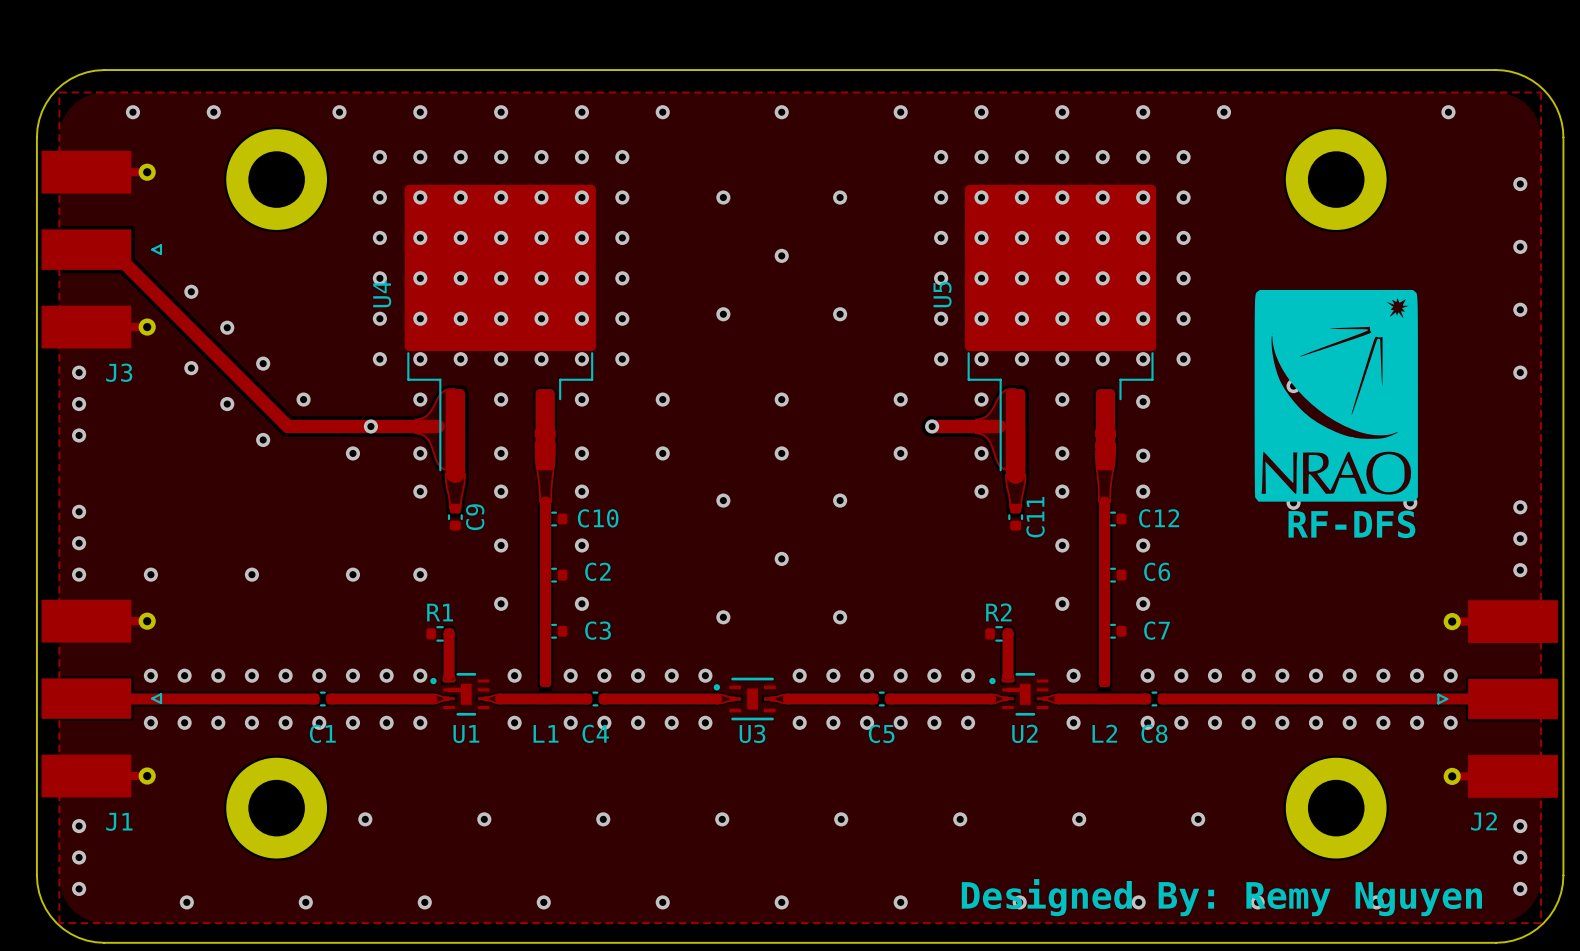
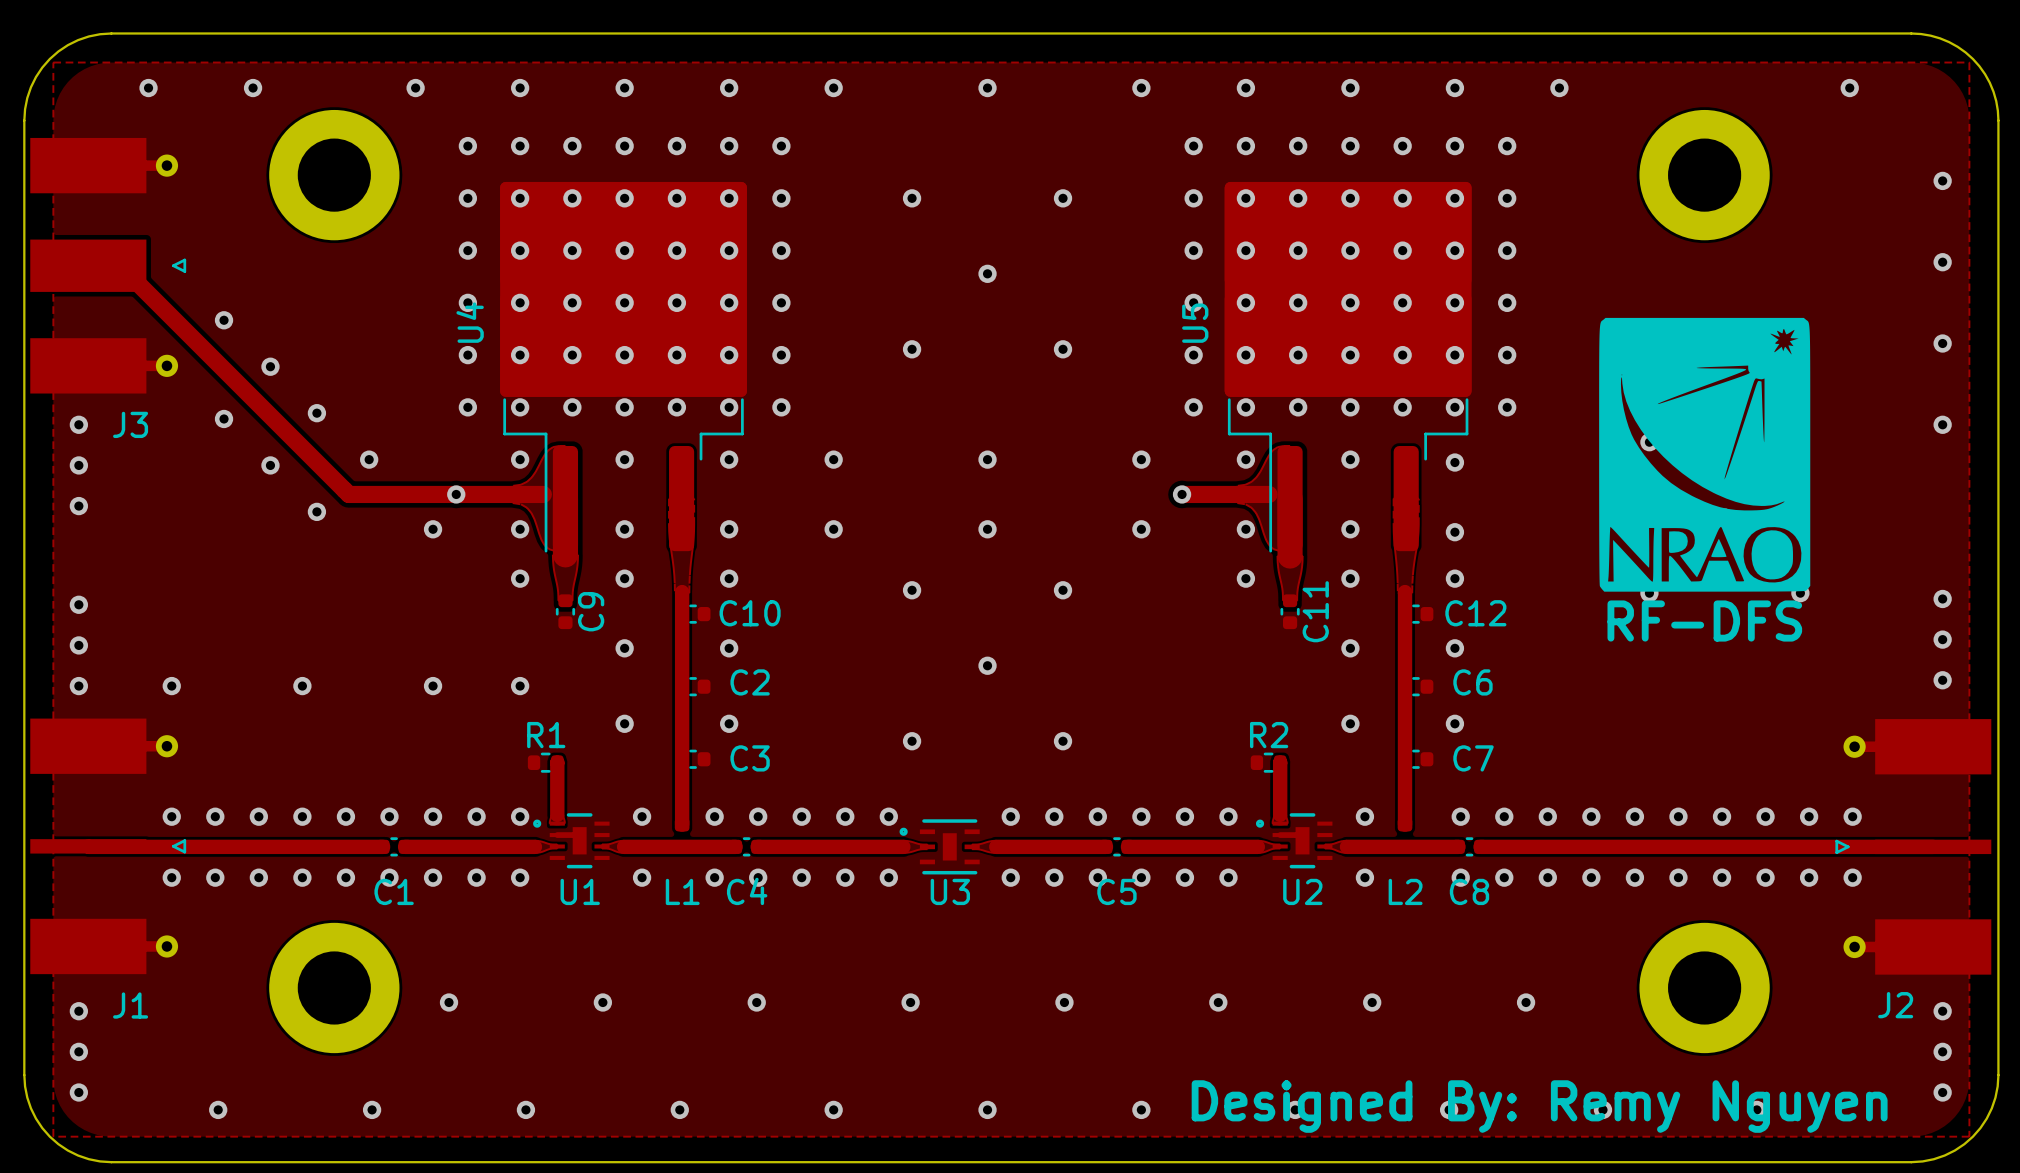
J1 footprint: [41, 599, 163, 798] -> [30, 718, 187, 975]
J2 footprint: [1437, 600, 1558, 798] -> [1835, 719, 1992, 975]

